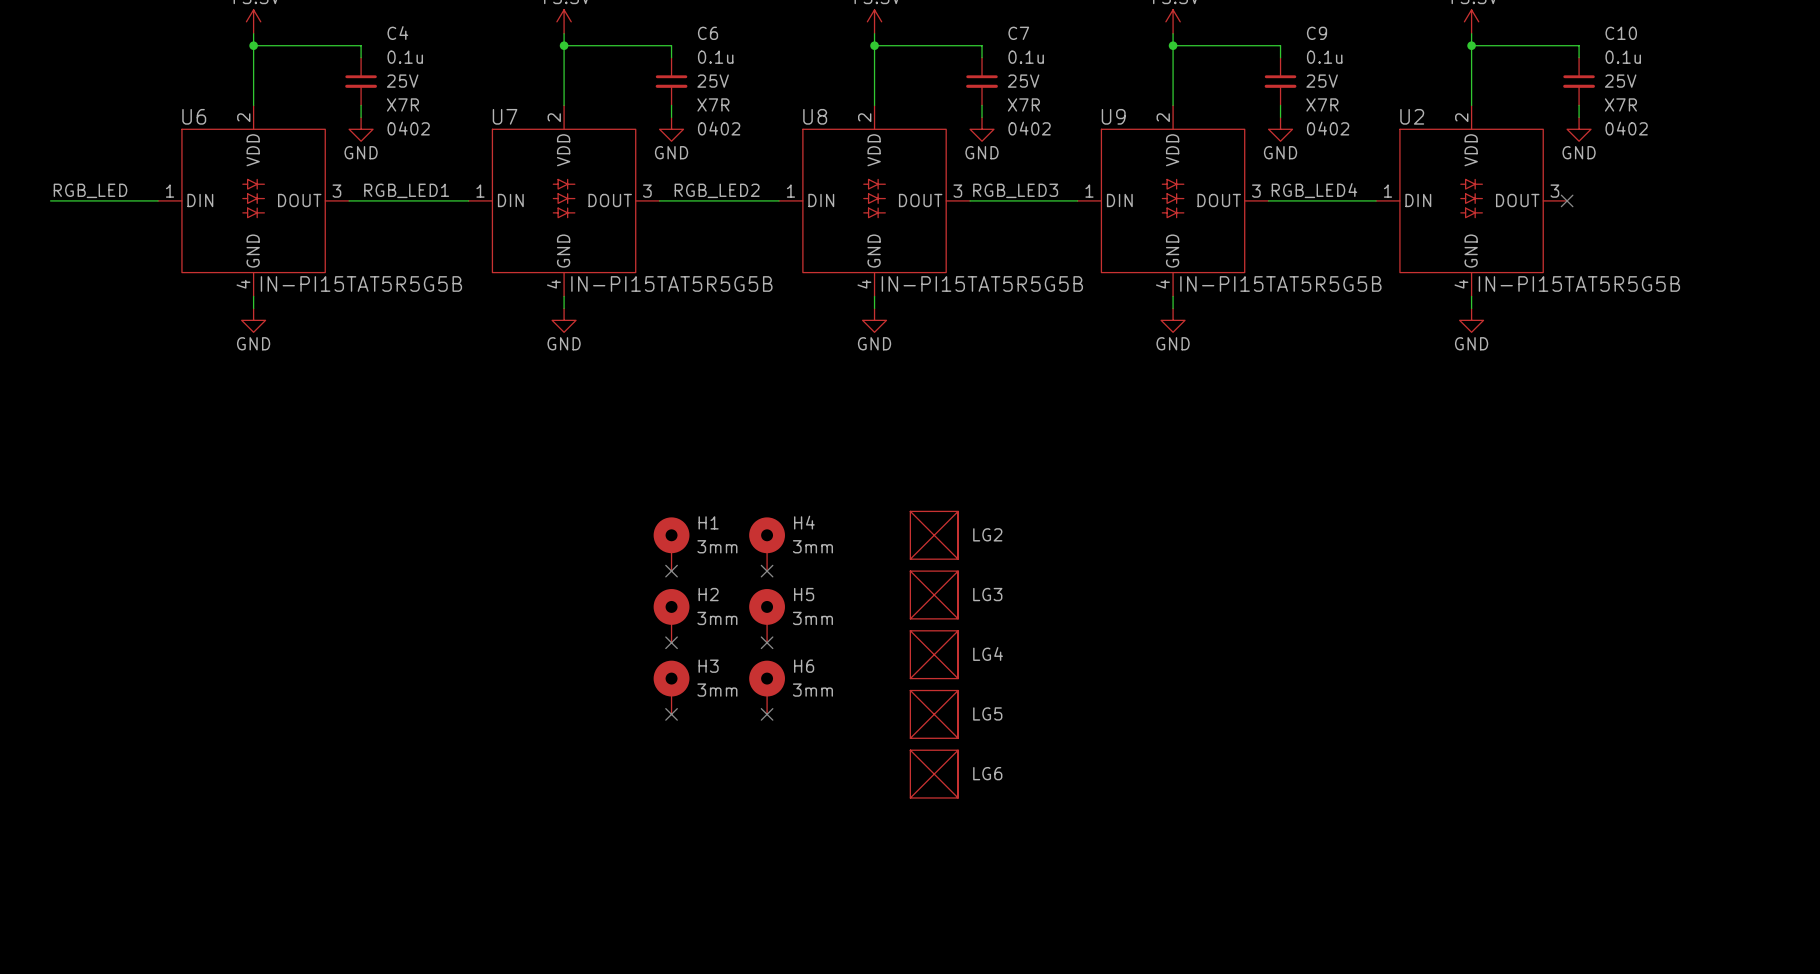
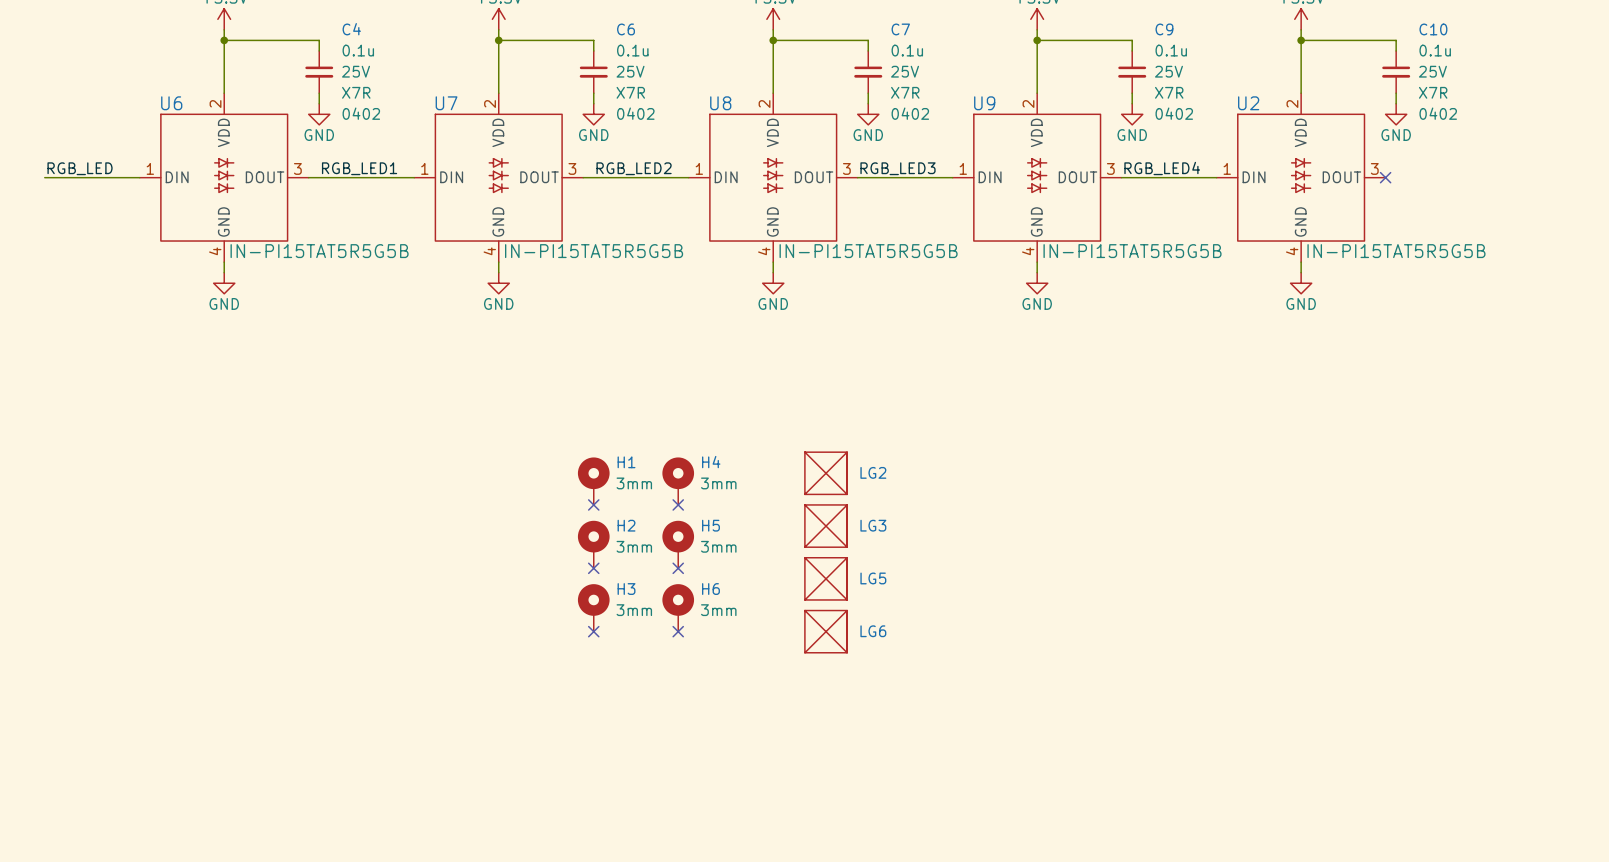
LG4 name: LG4 (988, 653) -> LG5 (873, 578)
LG5 name: LG5 (987, 713) -> LG6 (873, 631)
LG6: (934, 774) -> none

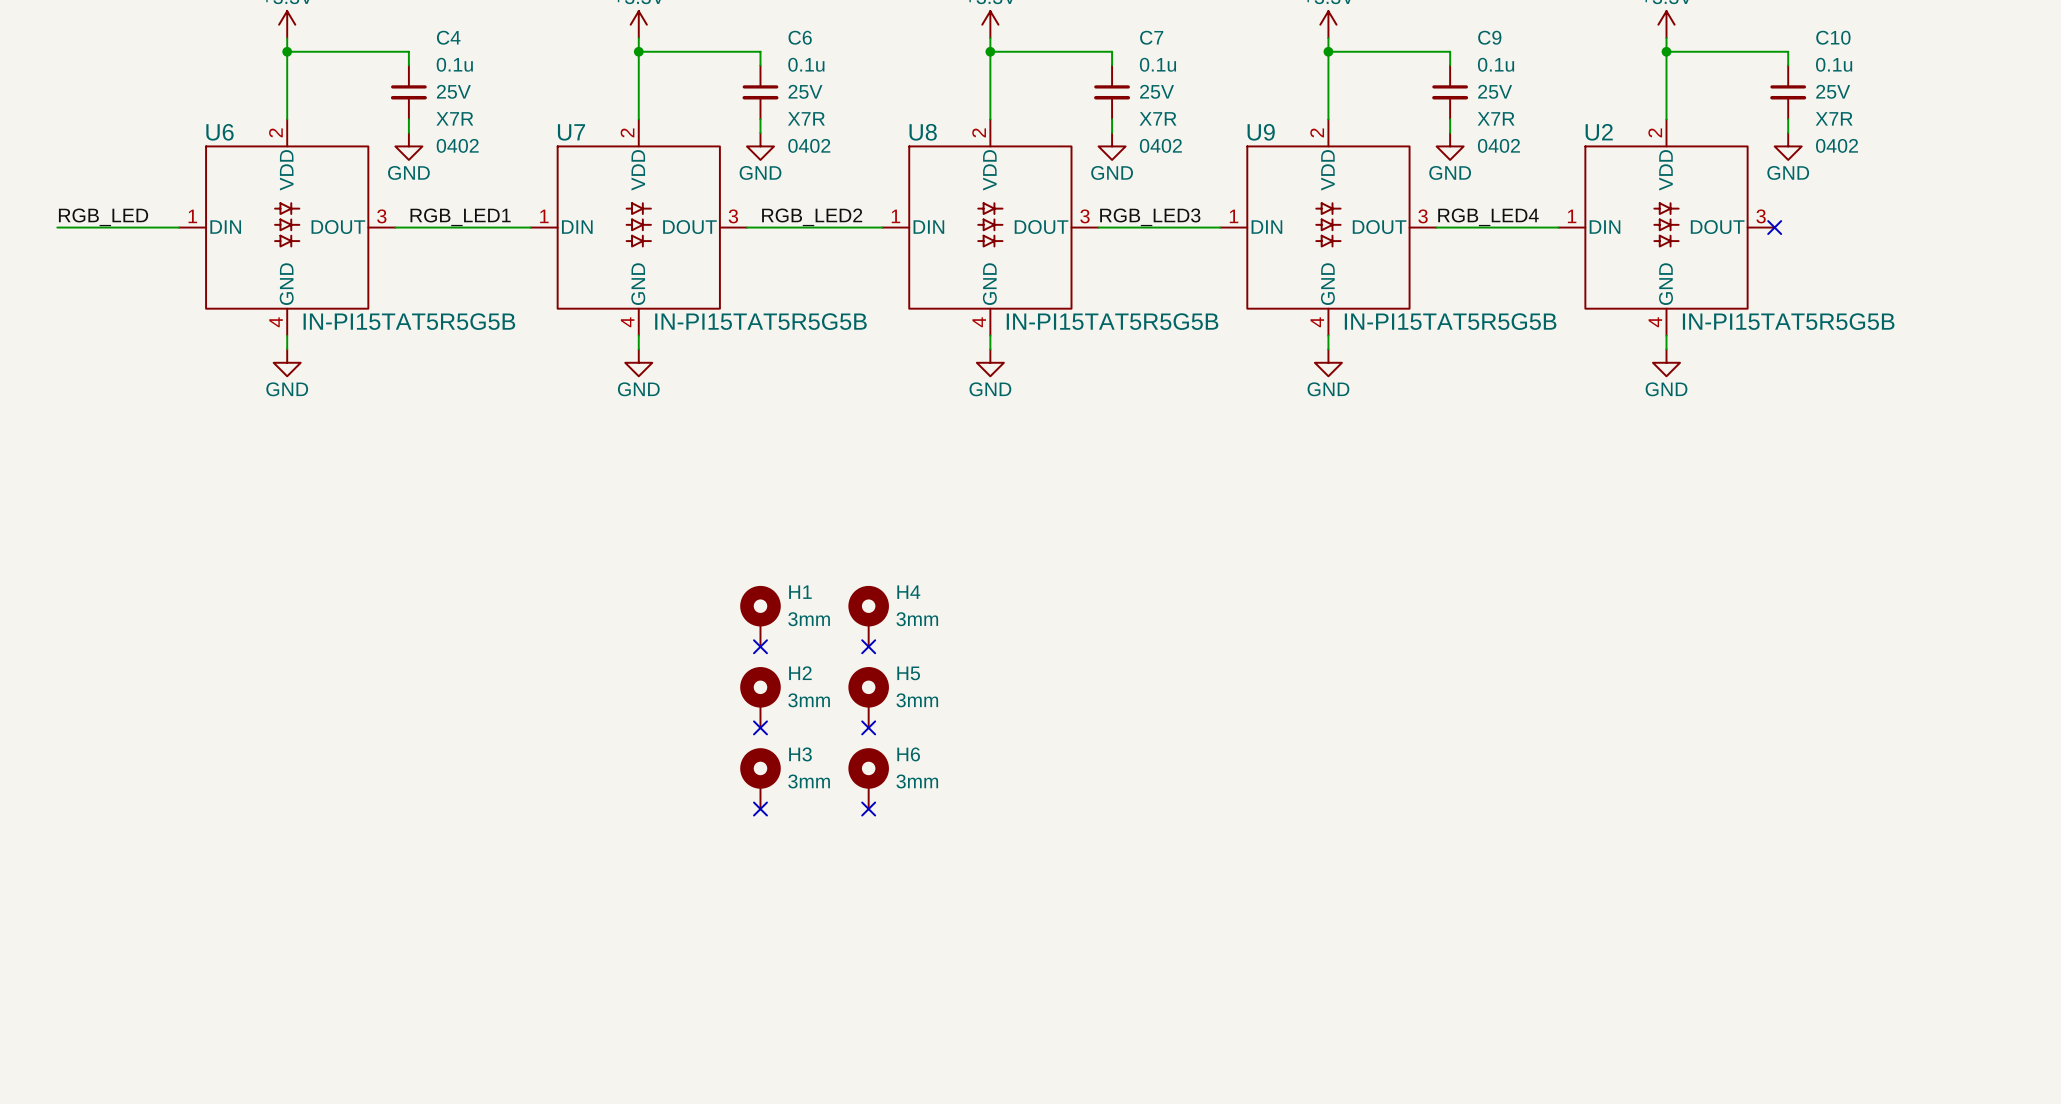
LG2: (826, 473) -> none
LG3: (826, 526) -> none
LG5: (826, 578) -> none
LG6: (826, 631) -> none

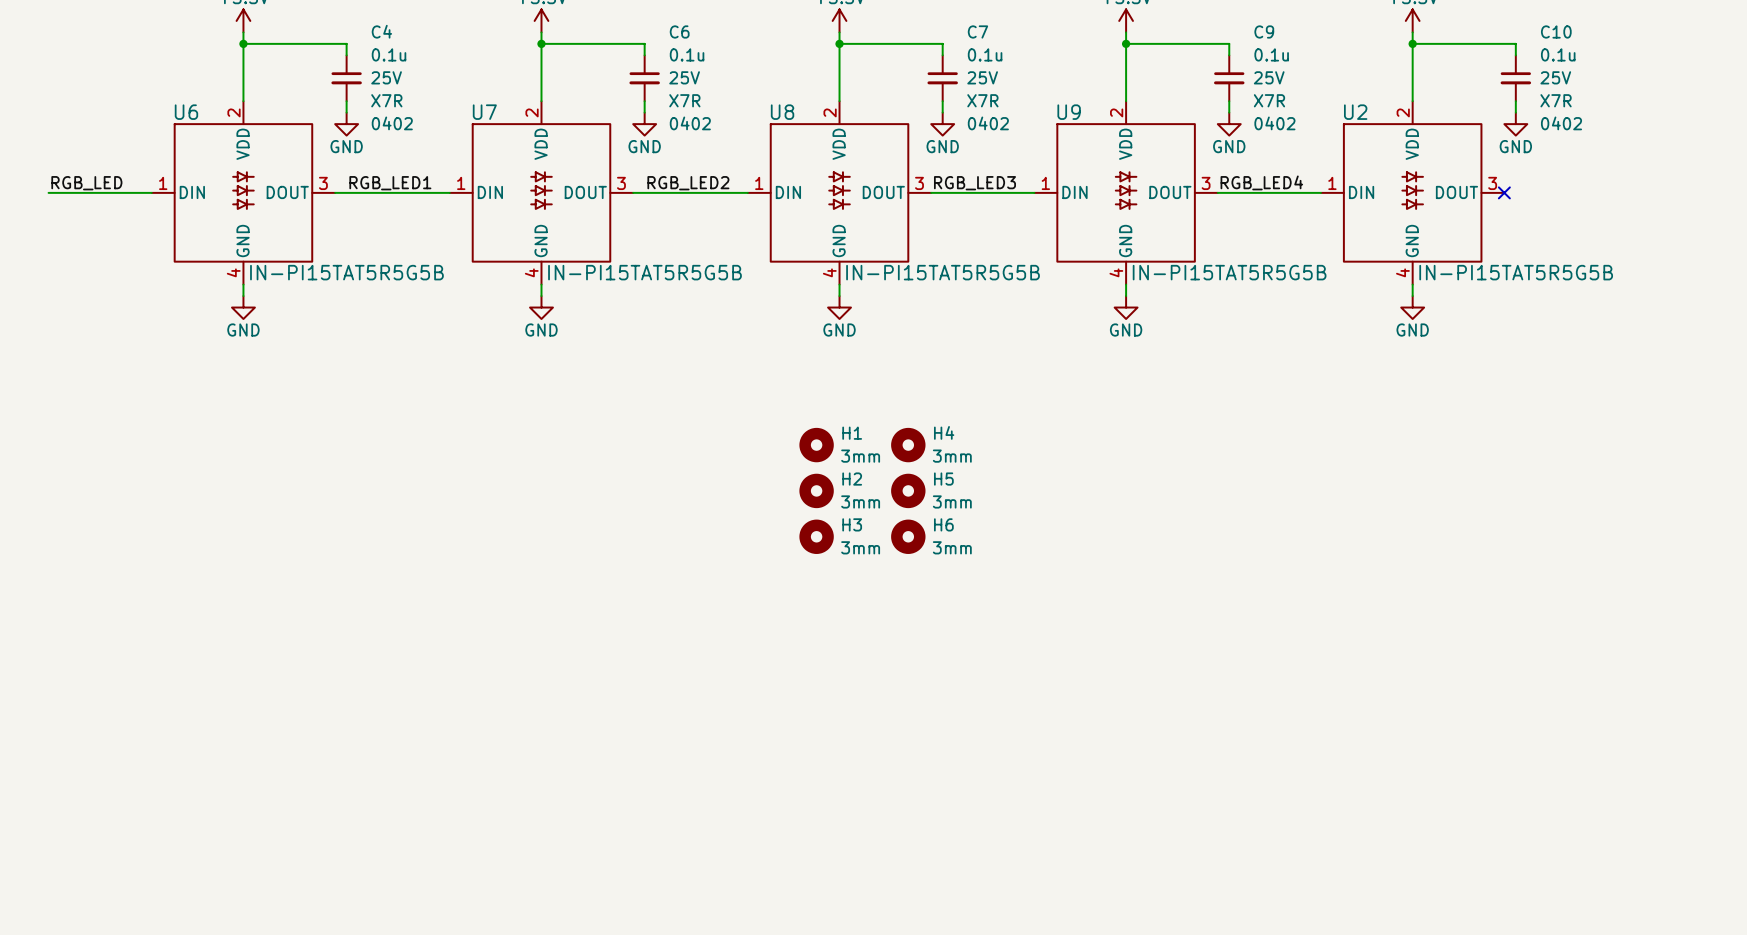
H1 symbol: [740, 585, 781, 647] -> [799, 427, 834, 463]
H4 symbol: [848, 585, 889, 647] -> [891, 427, 926, 463]
no-connect mark: (760, 646) -> none
no-connect mark: (868, 646) -> none
H2 symbol: [740, 667, 781, 728] -> [799, 473, 834, 509]
H5 symbol: [848, 667, 889, 728] -> [891, 473, 926, 509]
no-connect mark: (760, 727) -> none
no-connect mark: (868, 727) -> none
H3 symbol: [740, 748, 781, 810] -> [799, 519, 834, 554]
H6 symbol: [848, 748, 889, 810] -> [891, 519, 926, 554]
no-connect mark: (760, 809) -> none
no-connect mark: (868, 809) -> none

